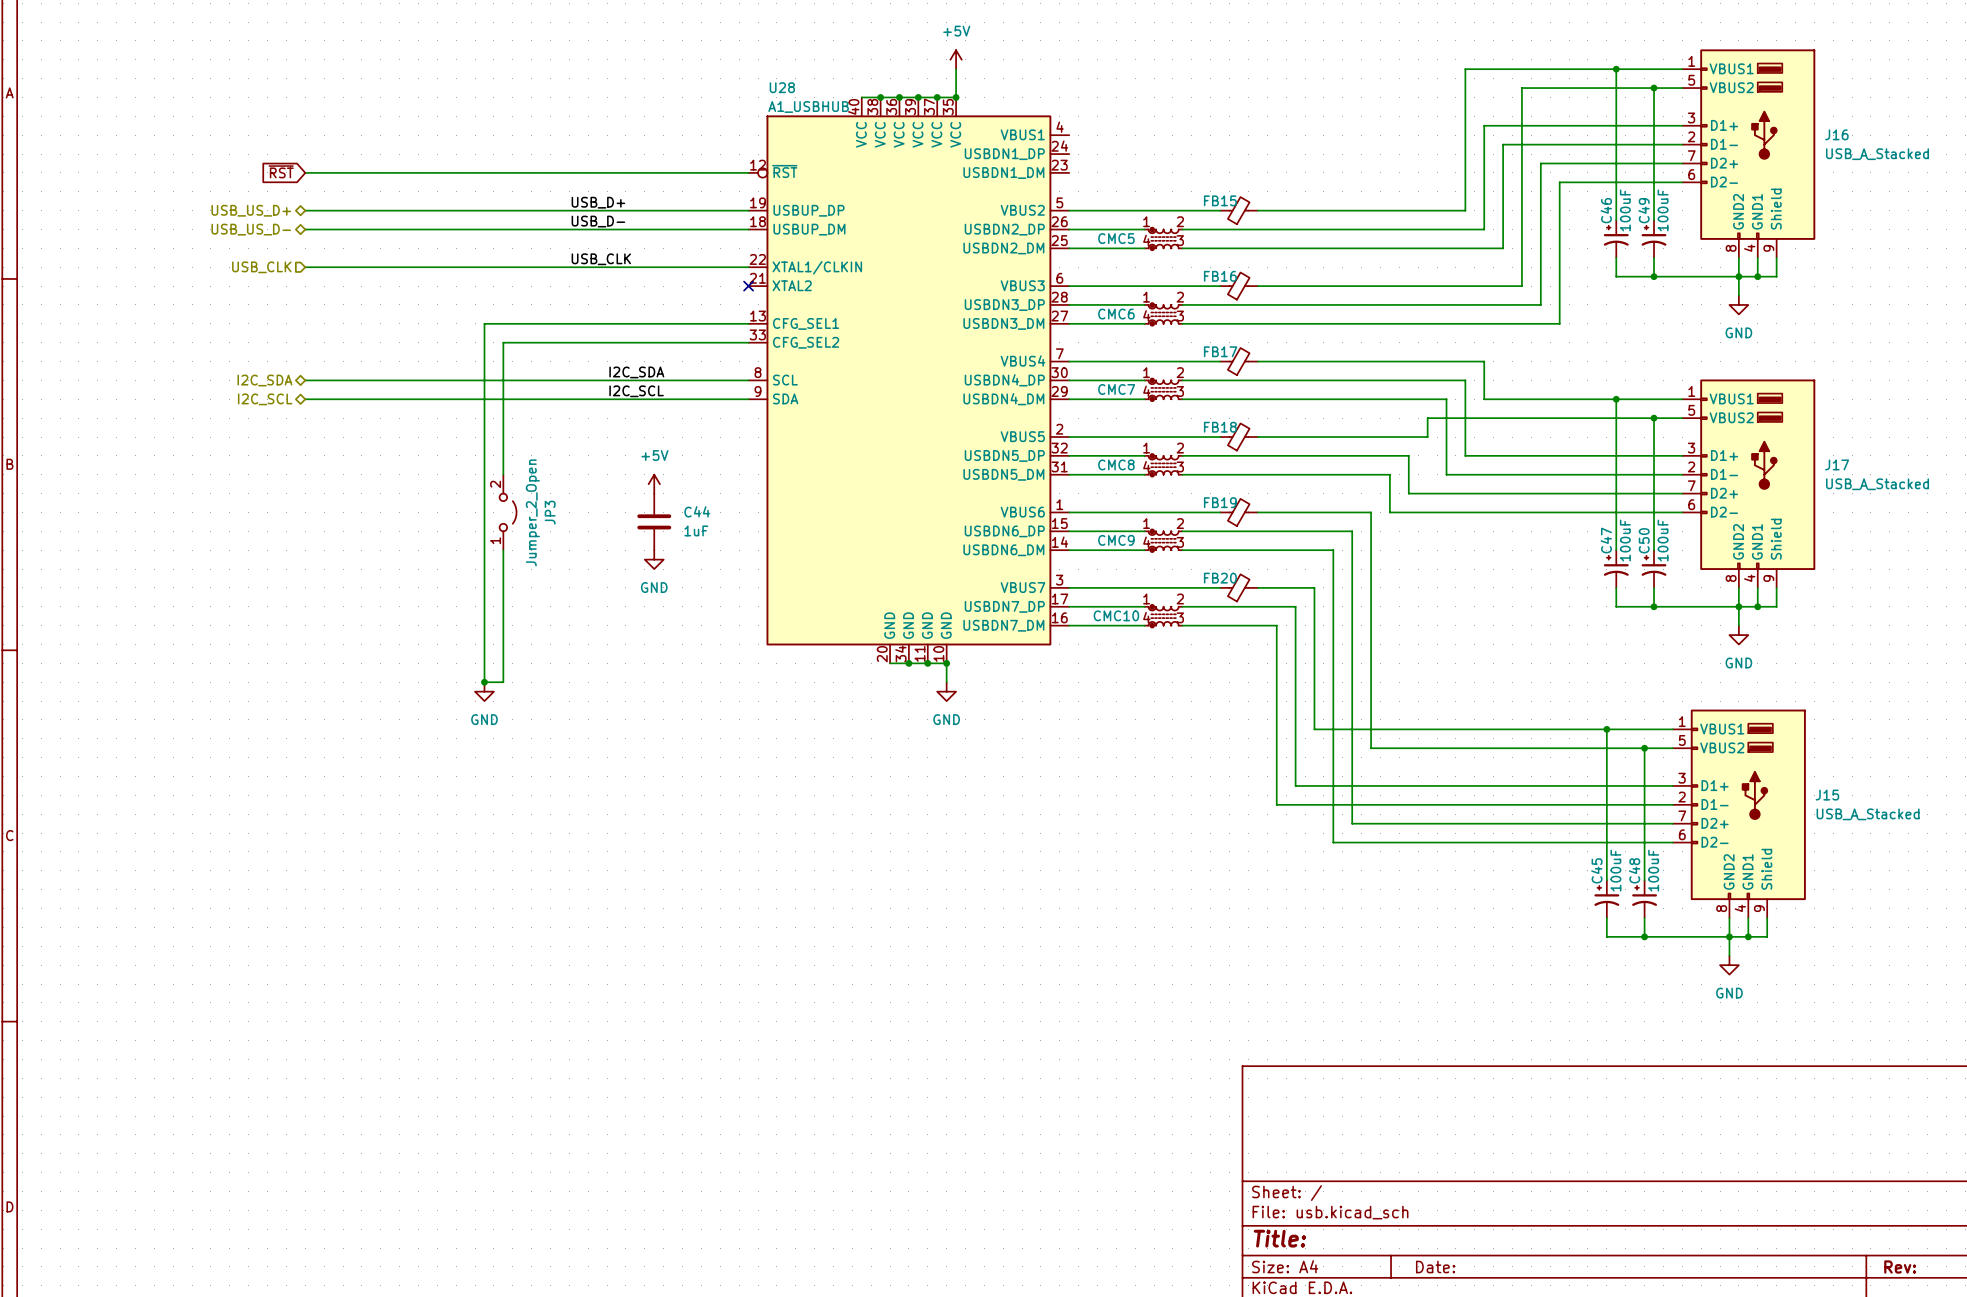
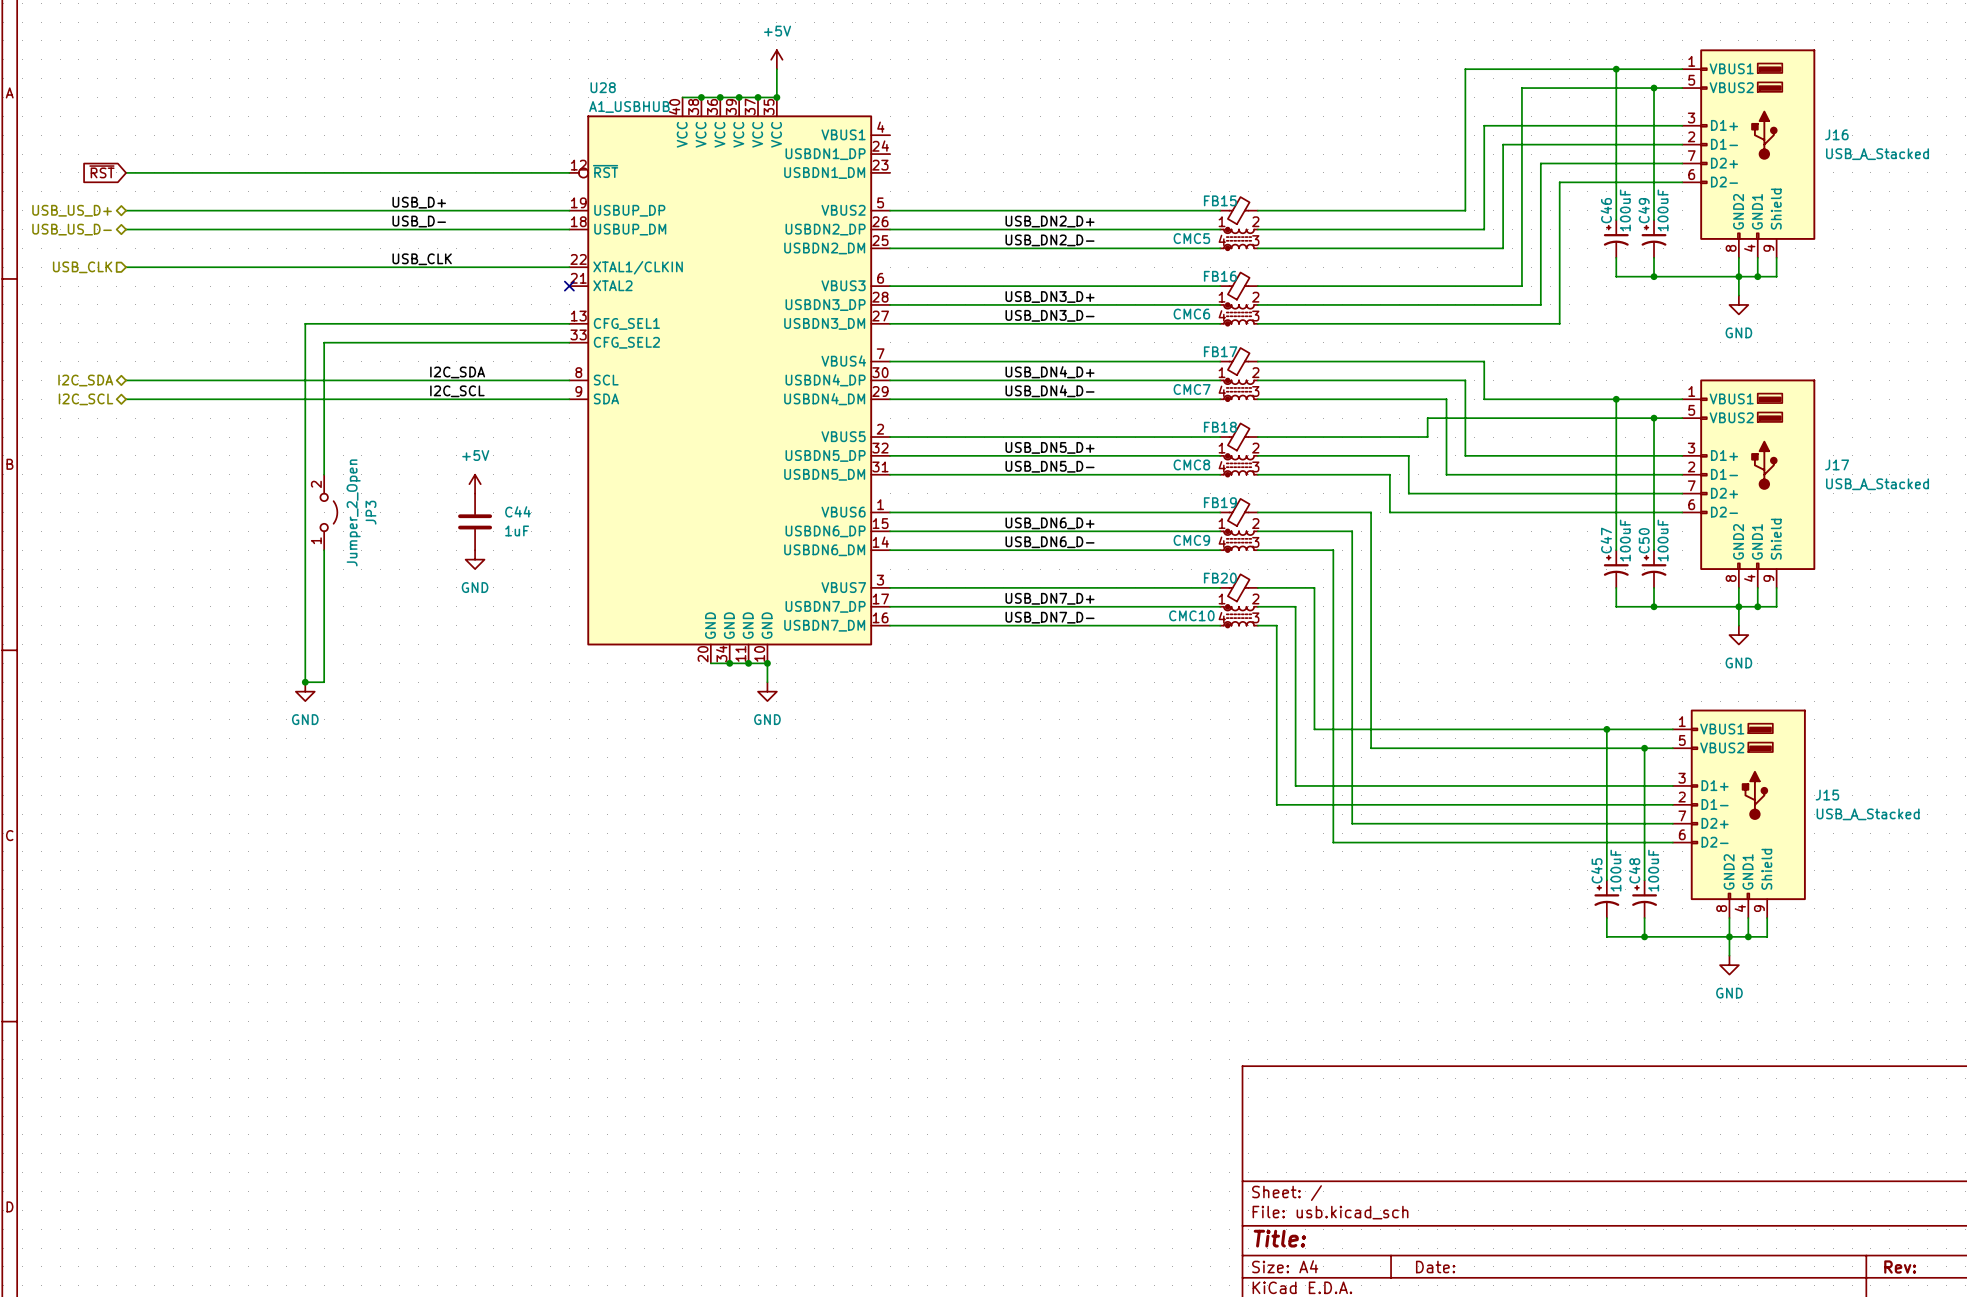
power symbol position: +5V (956, 59) -> +5V (776, 59)
wire: (956, 69) (956, 97) (861, 97) -> (776, 69) (776, 97) (682, 97)
junction: none -> (701, 97)
junction: none -> (720, 97)
junction: none -> (739, 97)
junction: none -> (758, 97)
junction: none -> (776, 97)
junction: (880, 97) -> none
junction: (899, 97) -> none
junction: (918, 97) -> none
junction: (937, 97) -> none
junction: (956, 97) -> none
global label position: ~{RST} (281, 171) -> ~{RST} (101, 171)
wire: none -> (126, 172) (305, 172)
label position: USB_D+ (598, 202) -> USB_D+ (419, 202)
wire: none -> (126, 210) (305, 210)
hierarchical label position: USB_US_D+ (251, 210) -> USB_US_D+ (72, 210)
label position: USB_D- (598, 221) -> USB_D- (419, 221)
label: none -> USB_DN2_D+ (1050, 221)
wire: none -> (126, 229) (305, 229)
hierarchical label position: USB_US_D- (251, 229) -> USB_US_D- (72, 229)
CMC5 position: (1163, 238) -> (1239, 238)
label: none -> USB_DN2_D- (1050, 240)
label position: USB_CLK (601, 259) -> USB_CLK (422, 259)
wire: none -> (126, 267) (305, 267)
hierarchical label position: USB_CLK (261, 267) -> USB_CLK (82, 267)
no-connect mark: none -> (569, 286)
no-connect mark: (748, 286) -> none
label: none -> USB_DN3_D+ (1050, 296)
CMC6 position: (1163, 314) -> (1239, 314)
label: none -> USB_DN3_D- (1050, 315)
wire: (484, 323) (484, 682) (503, 682) (503, 550) -> (484, 323) (305, 323) (305, 682) (324, 682) (324, 550)
wire: (503, 342) (503, 474) -> (503, 342) (324, 342) (324, 474)
label position: I2C_SDA (636, 372) -> I2C_SDA (457, 372)
label: none -> USB_DN4_D+ (1050, 372)
wire: none -> (126, 380) (305, 380)
hierarchical label position: I2C_SDA (264, 380) -> I2C_SDA (85, 380)
U28 position: (908, 380) -> (729, 380)
CMC7 position: (1163, 389) -> (1239, 389)
label position: I2C_SCL (636, 391) -> I2C_SCL (457, 391)
label: none -> USB_DN4_D- (1050, 391)
wire: none -> (126, 399) (305, 399)
hierarchical label position: I2C_SCL (265, 399) -> I2C_SCL (85, 399)
label: none -> USB_DN5_D+ (1050, 447)
CMC8 position: (1163, 465) -> (1239, 465)
label: none -> USB_DN5_D- (1050, 466)
power symbol position: +5V (654, 484) -> +5V (475, 484)
JP3 position: (508, 512) -> (328, 512)
C44 position: (654, 521) -> (475, 521)
label: none -> USB_DN6_D+ (1050, 523)
CMC9 position: (1163, 540) -> (1239, 540)
label: none -> USB_DN6_D- (1050, 542)
power symbol: none -> GND (475, 559)
power symbol: GND (654, 559) -> none
label: none -> USB_DN7_D+ (1050, 598)
CMC10 position: (1163, 616) -> (1239, 616)
label: none -> USB_DN7_D- (1050, 617)
junction: none -> (729, 663)
junction: none -> (748, 663)
junction: none -> (767, 663)
wire: (890, 663) (946, 663) (946, 682) -> (710, 663) (767, 663) (767, 682)
junction: (908, 663) -> none
junction: (927, 663) -> none
junction: (946, 663) -> none
junction: none -> (305, 682)
junction: (484, 682) -> none
power symbol: none -> GND (305, 691)
power symbol: GND (484, 691) -> none
power symbol: none -> GND (767, 691)
power symbol: GND (946, 691) -> none

